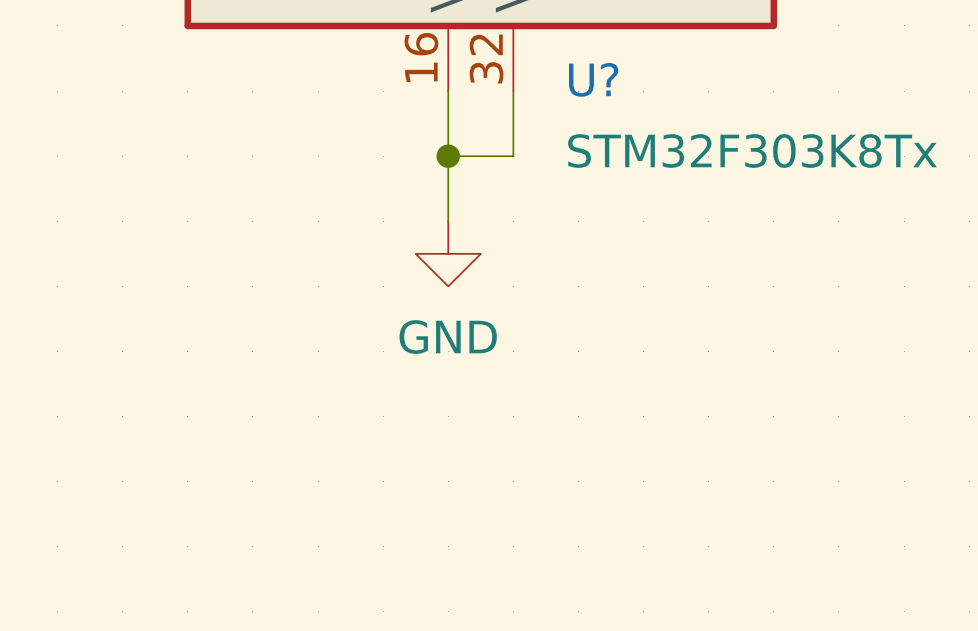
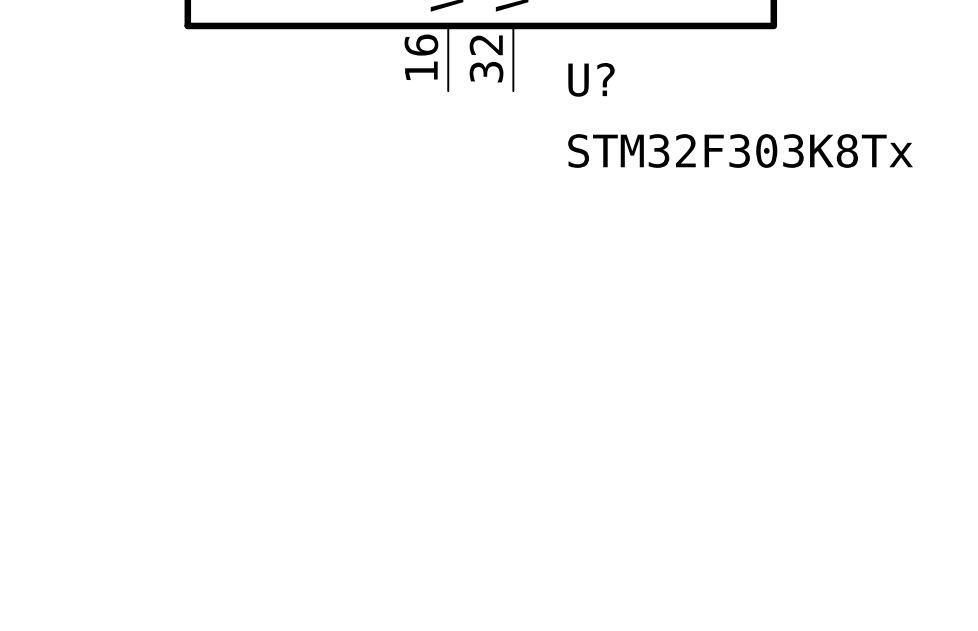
wire: (448, 91) (448, 221) -> none
wire: (513, 91) (513, 156) (448, 156) -> none
junction: (448, 156) -> none
power symbol: GND (448, 253) -> none

